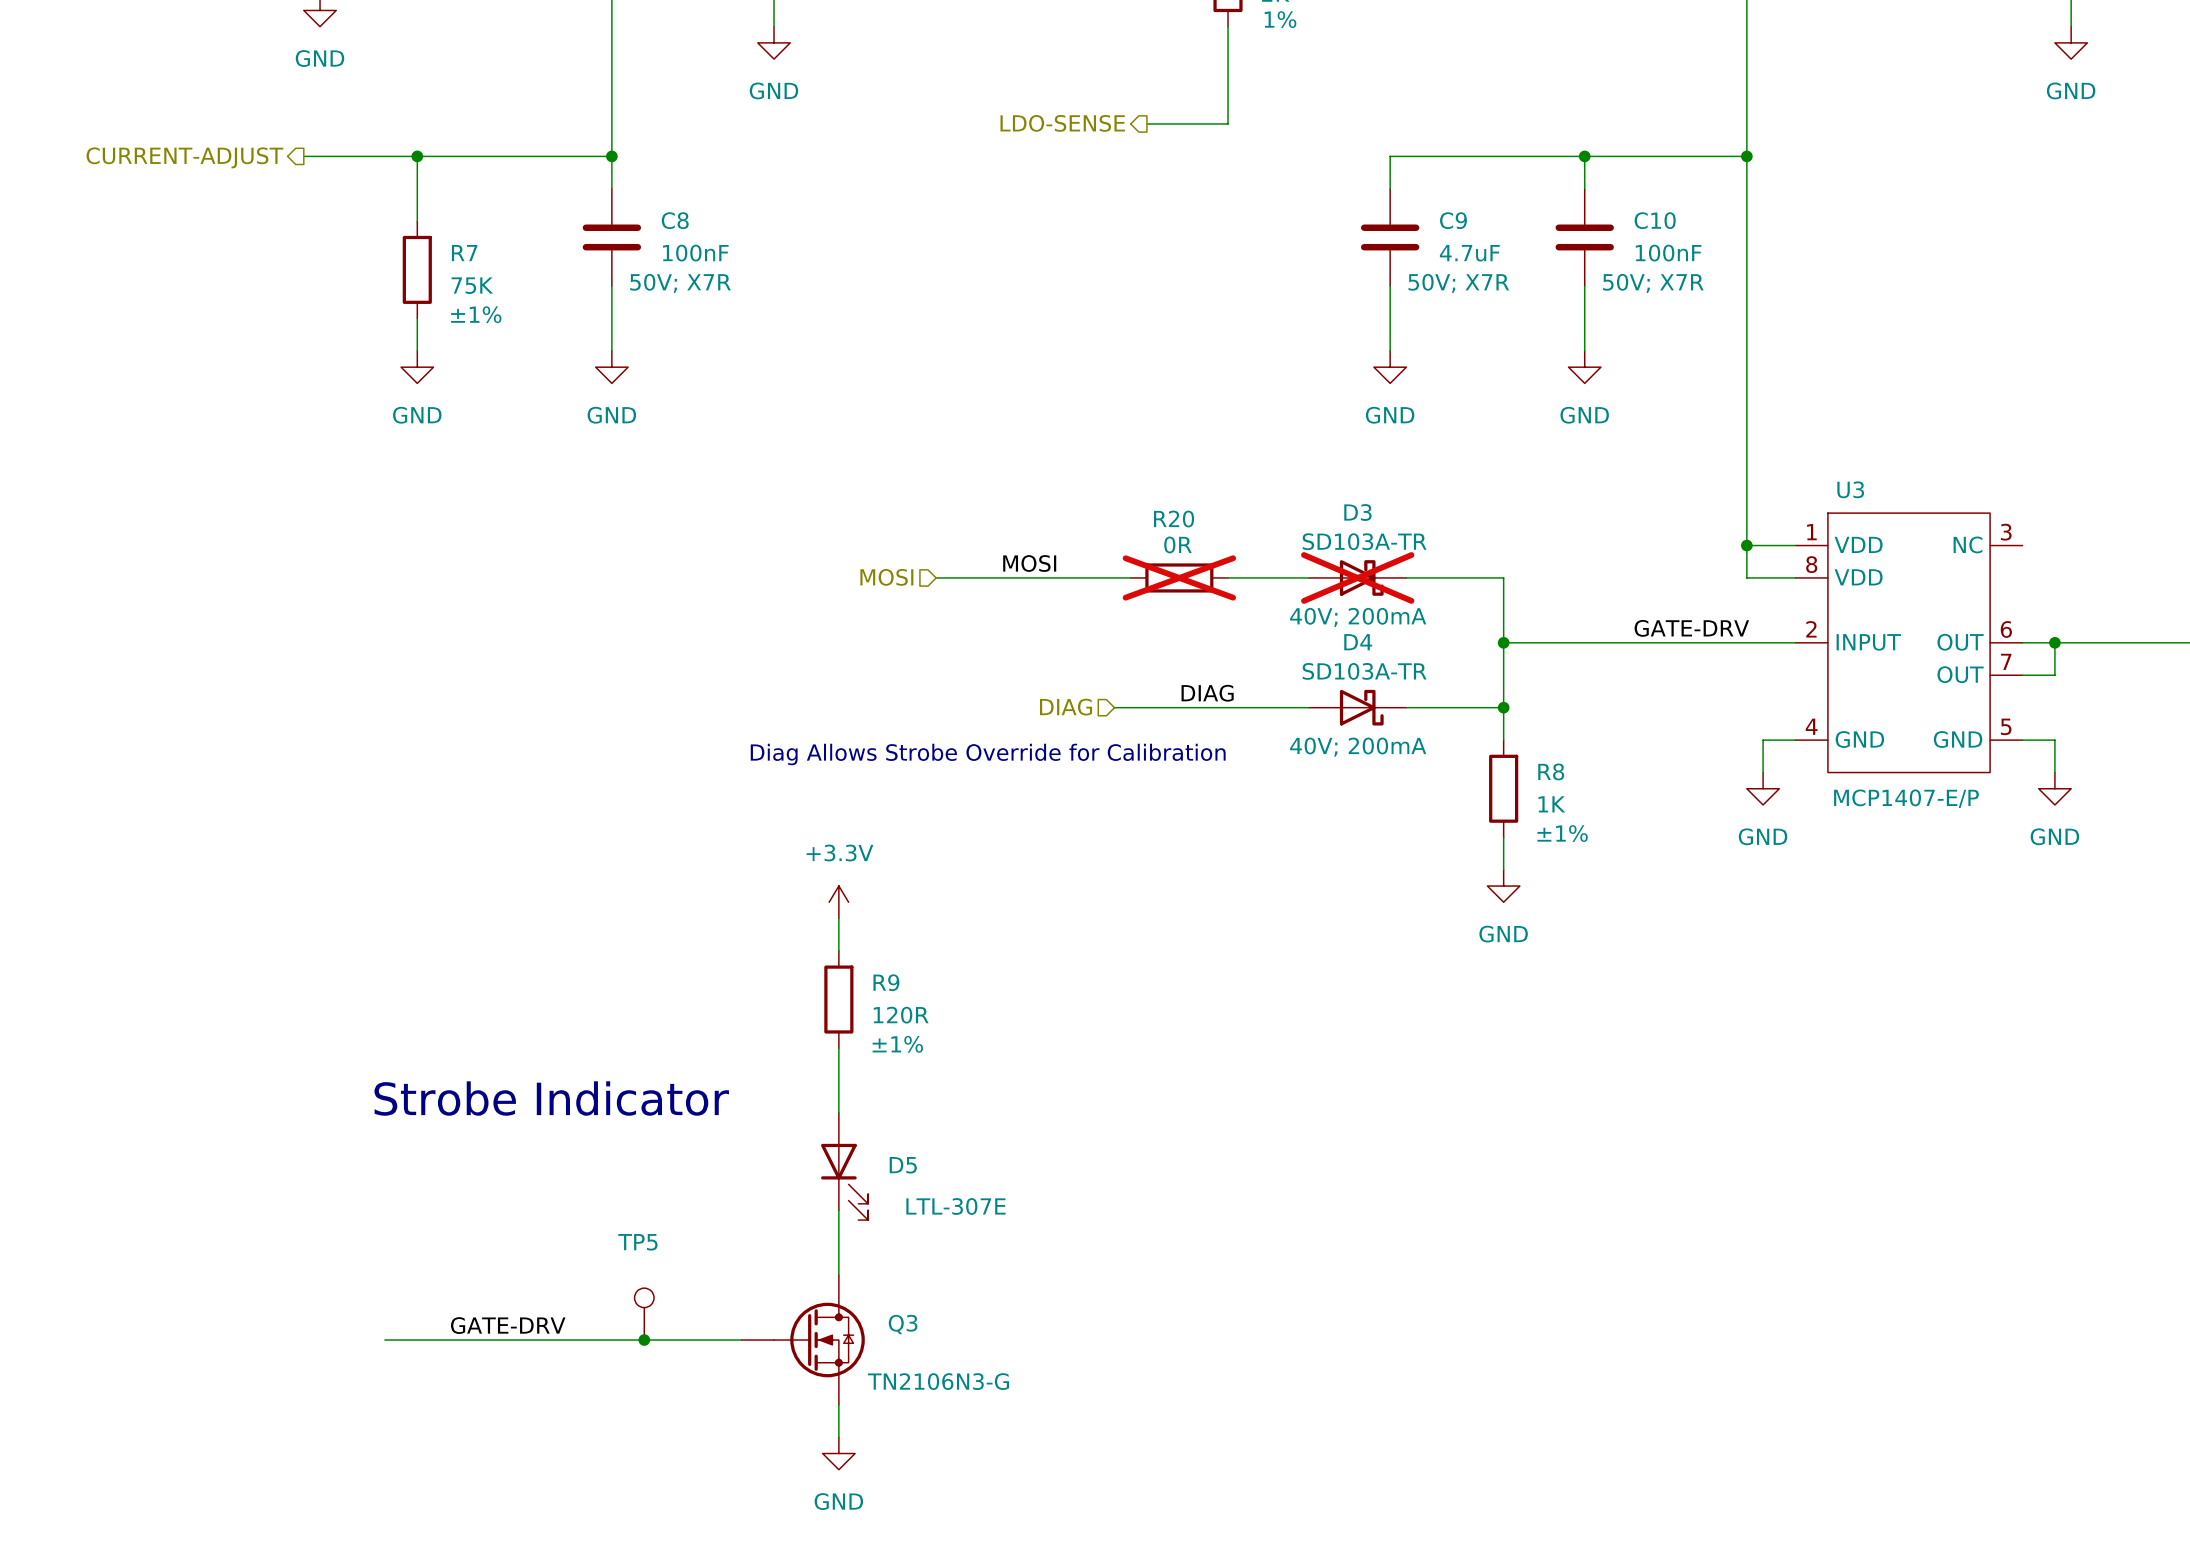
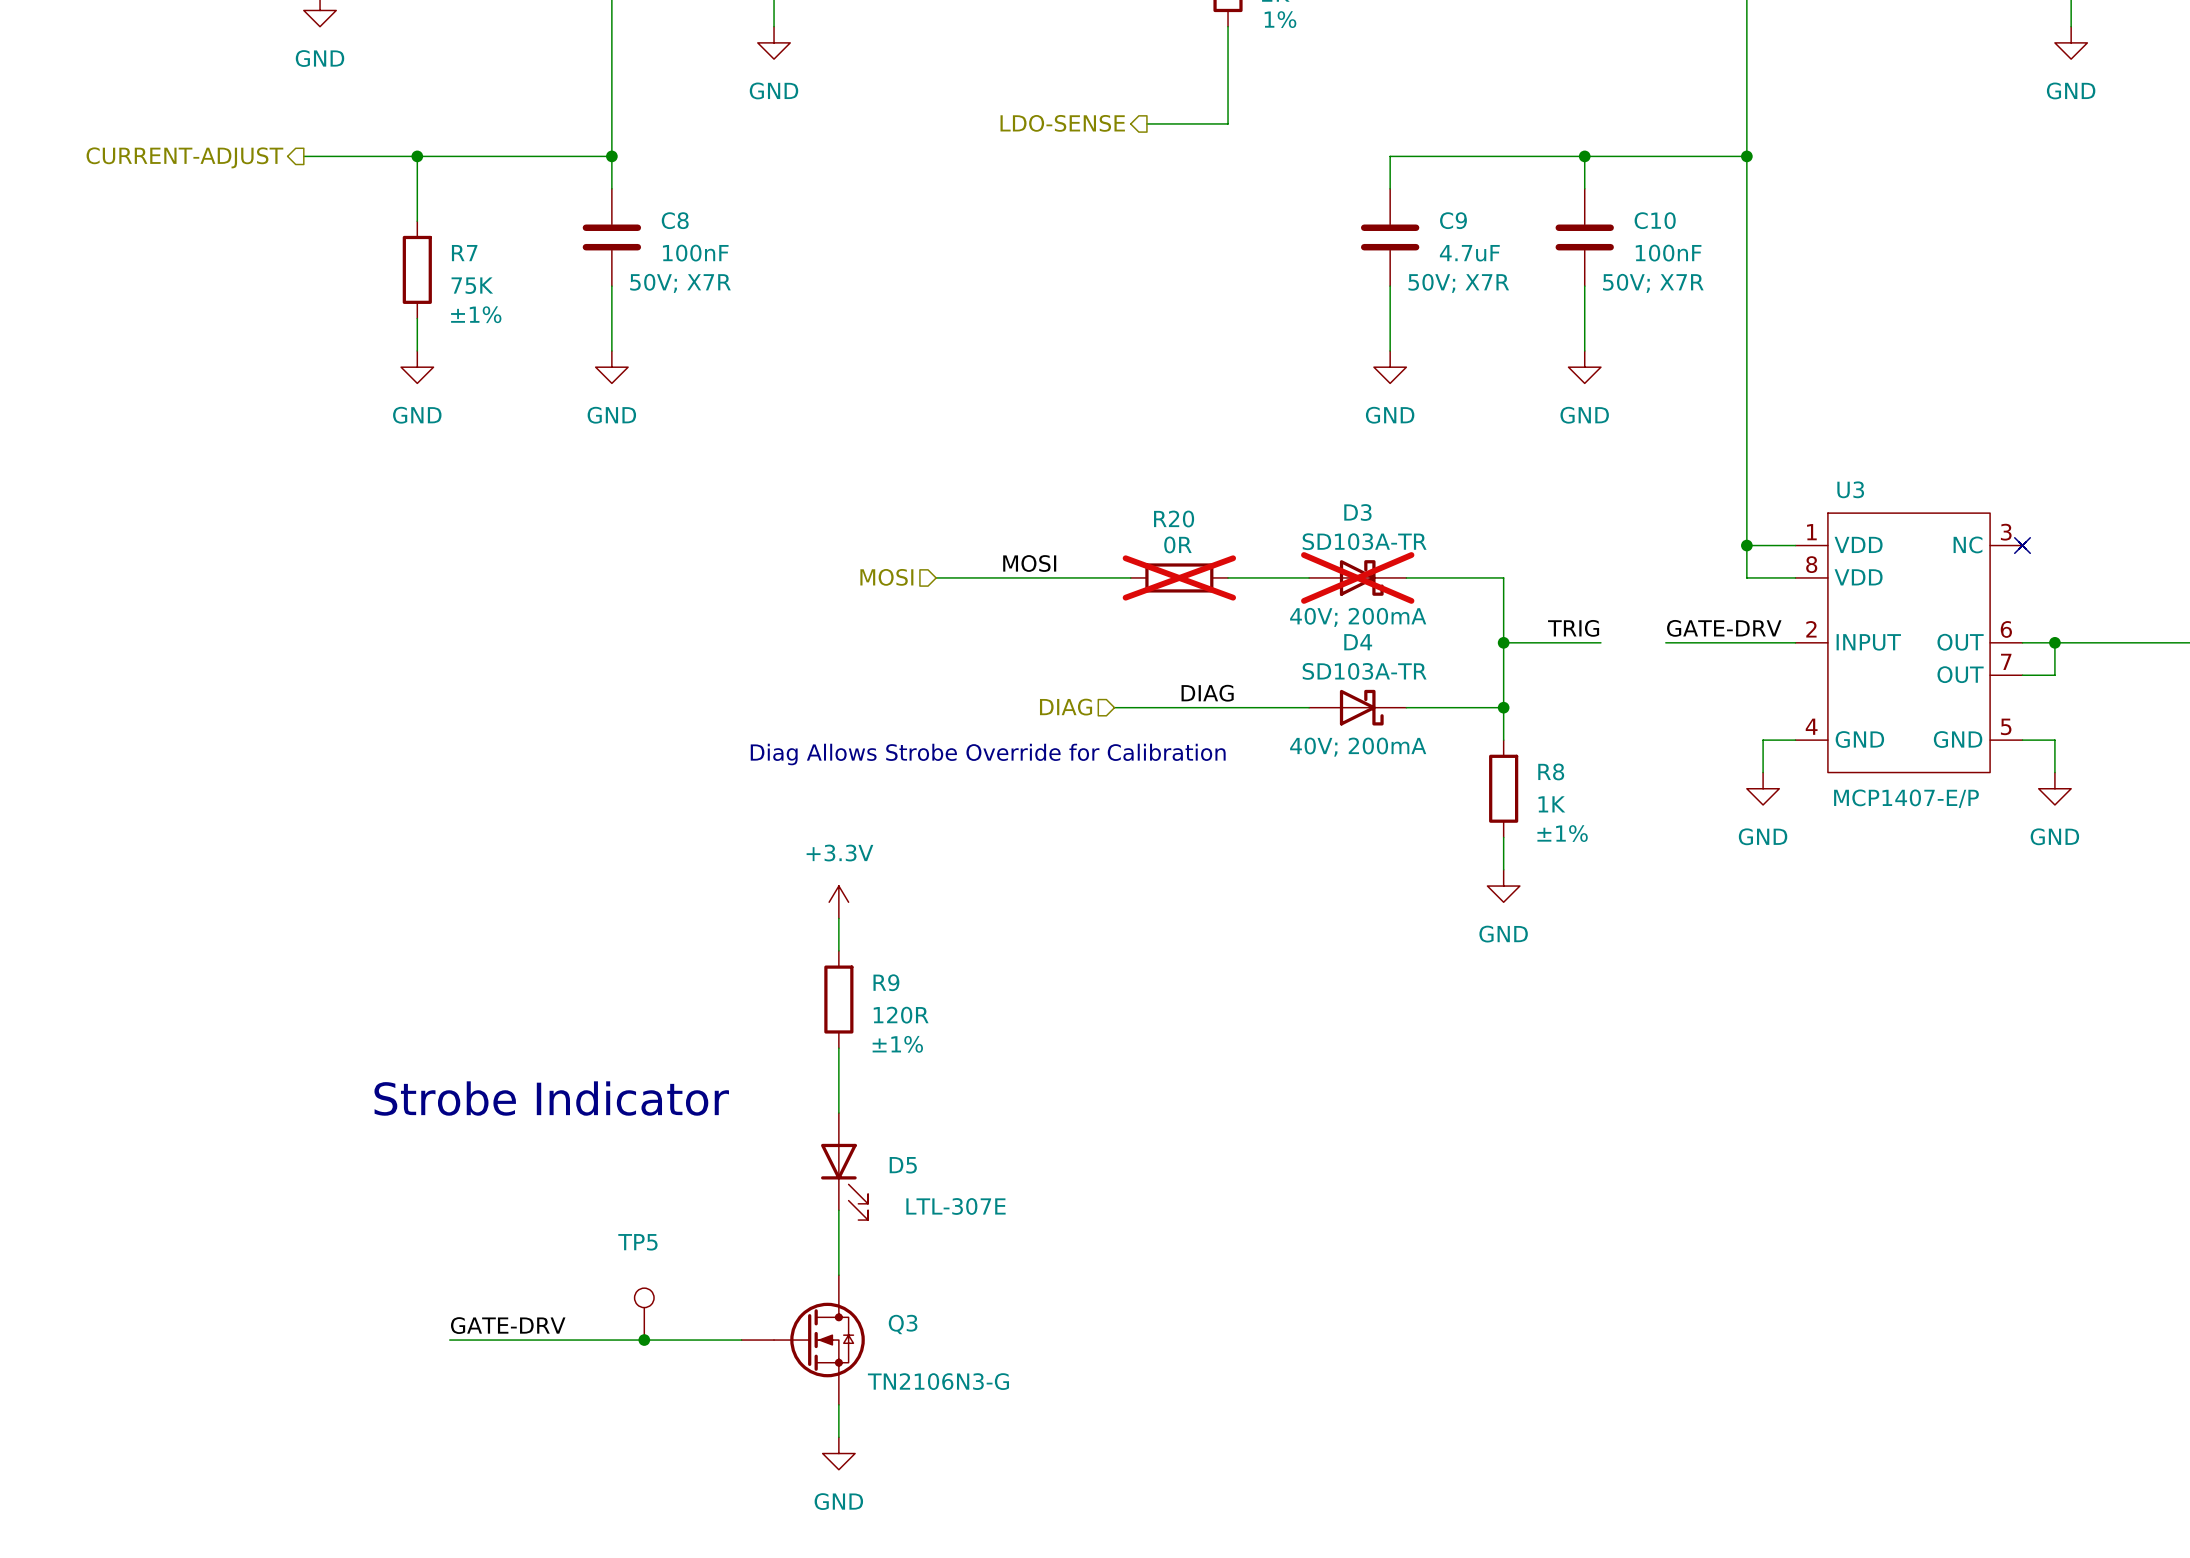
U3 symbol: [1795, 513, 2023, 773] -> [1795, 513, 2027, 773]
no-connect mark: none -> (2022, 545)
label: none -> TRIG (1573, 628)
label position: GATE-DRV (1691, 628) -> GATE-DRV (1724, 628)
wire: (1600, 642) (1665, 642) -> none
wire: (384, 1340) (449, 1340) -> none

